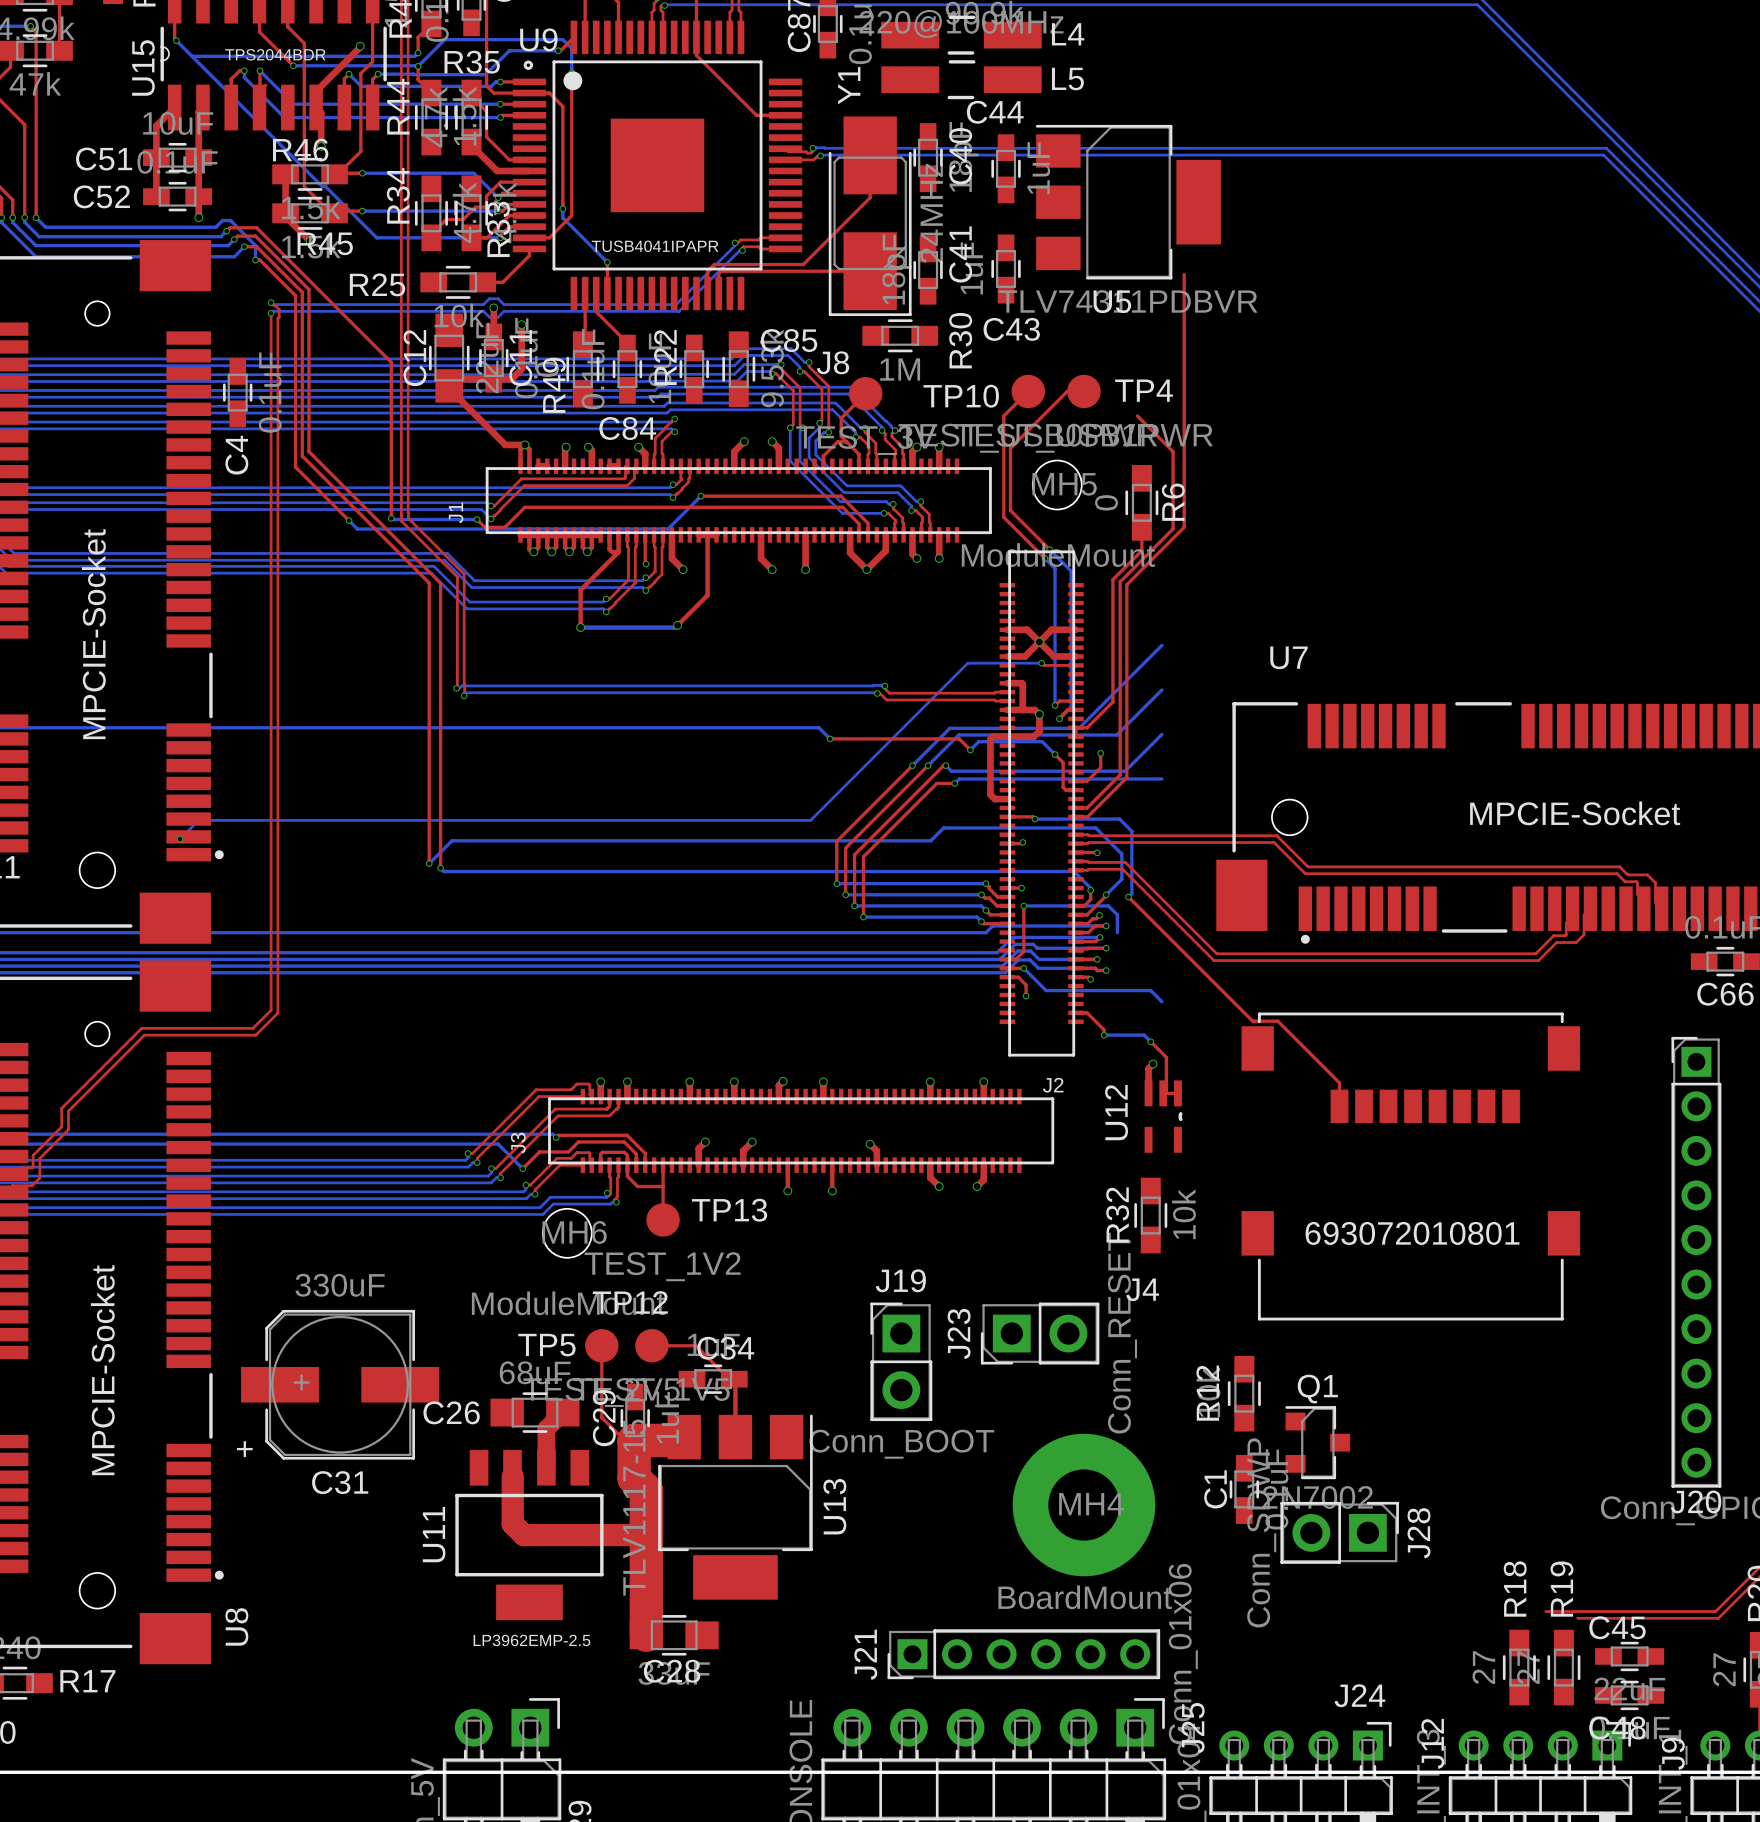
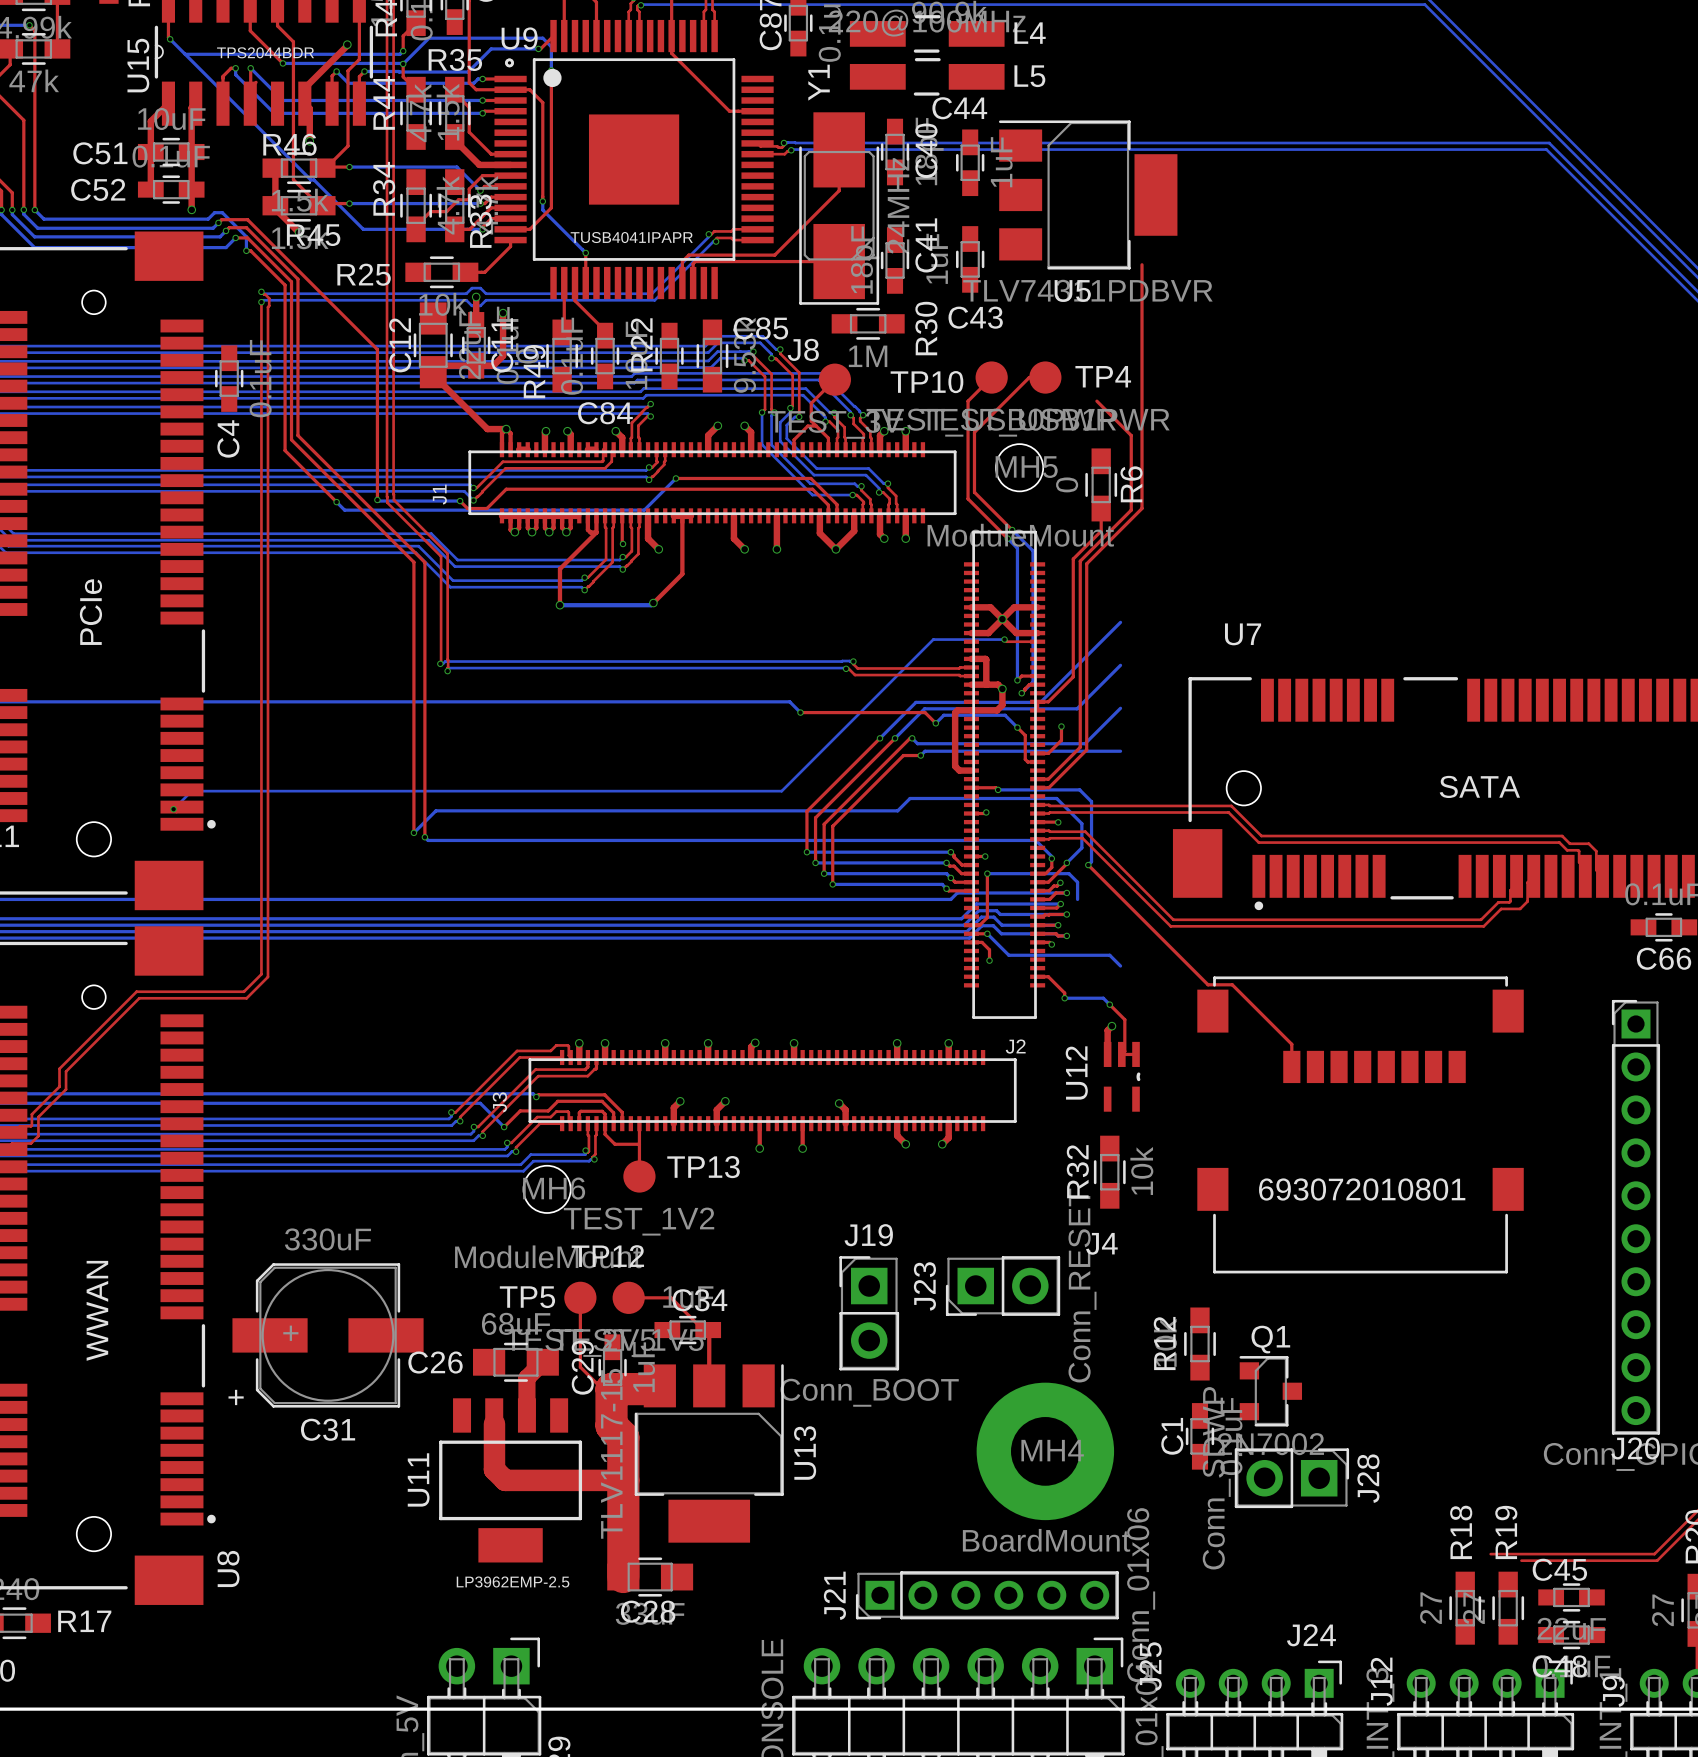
part value: MPCIE-Socket (93, 634) -> PCIe (90, 612)
U7 value: MPCIE-Socket (1575, 813) -> SATA (1479, 786)
U8 value: MPCIE-Socket (102, 1370) -> WWAN (97, 1310)

